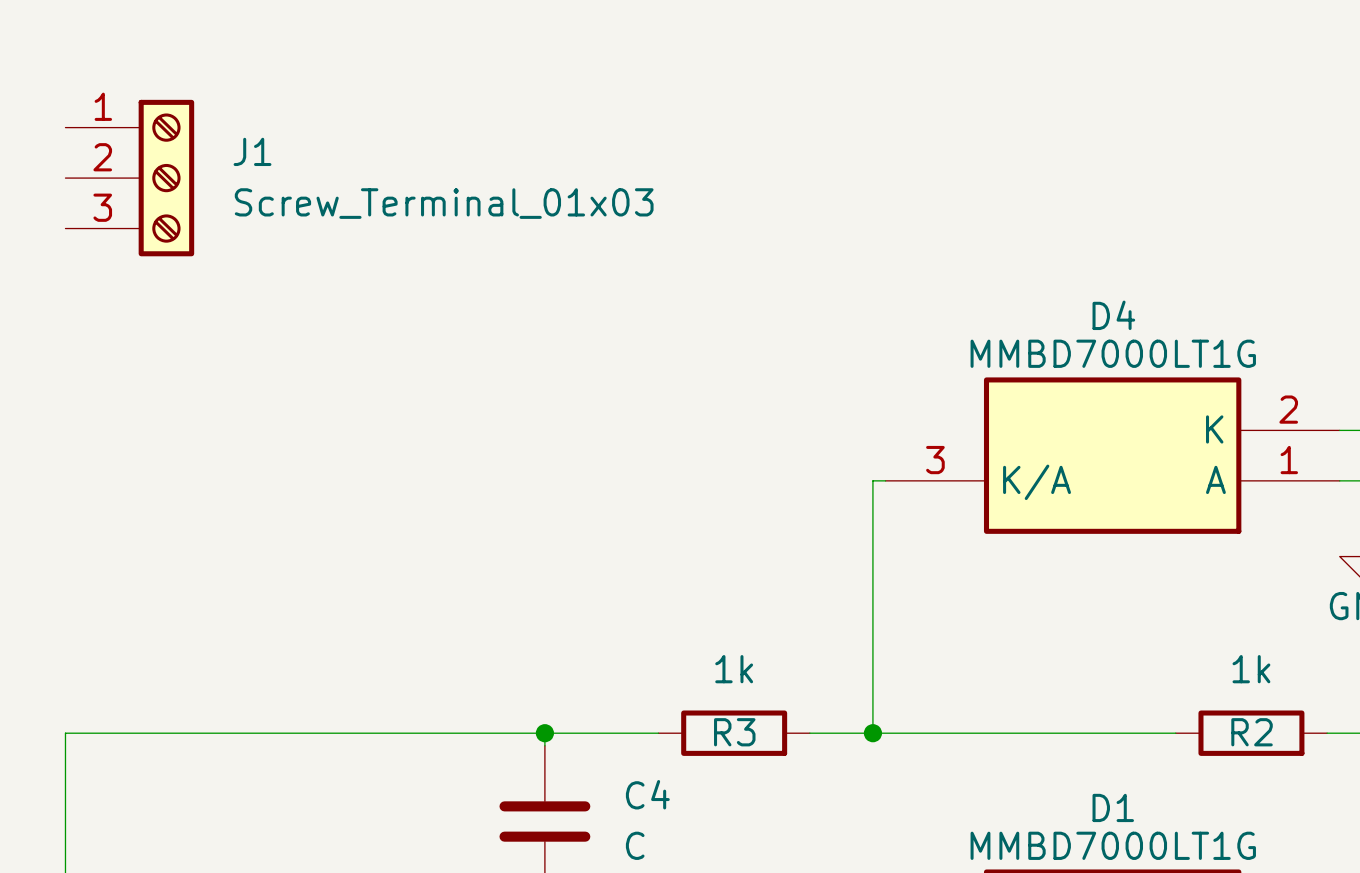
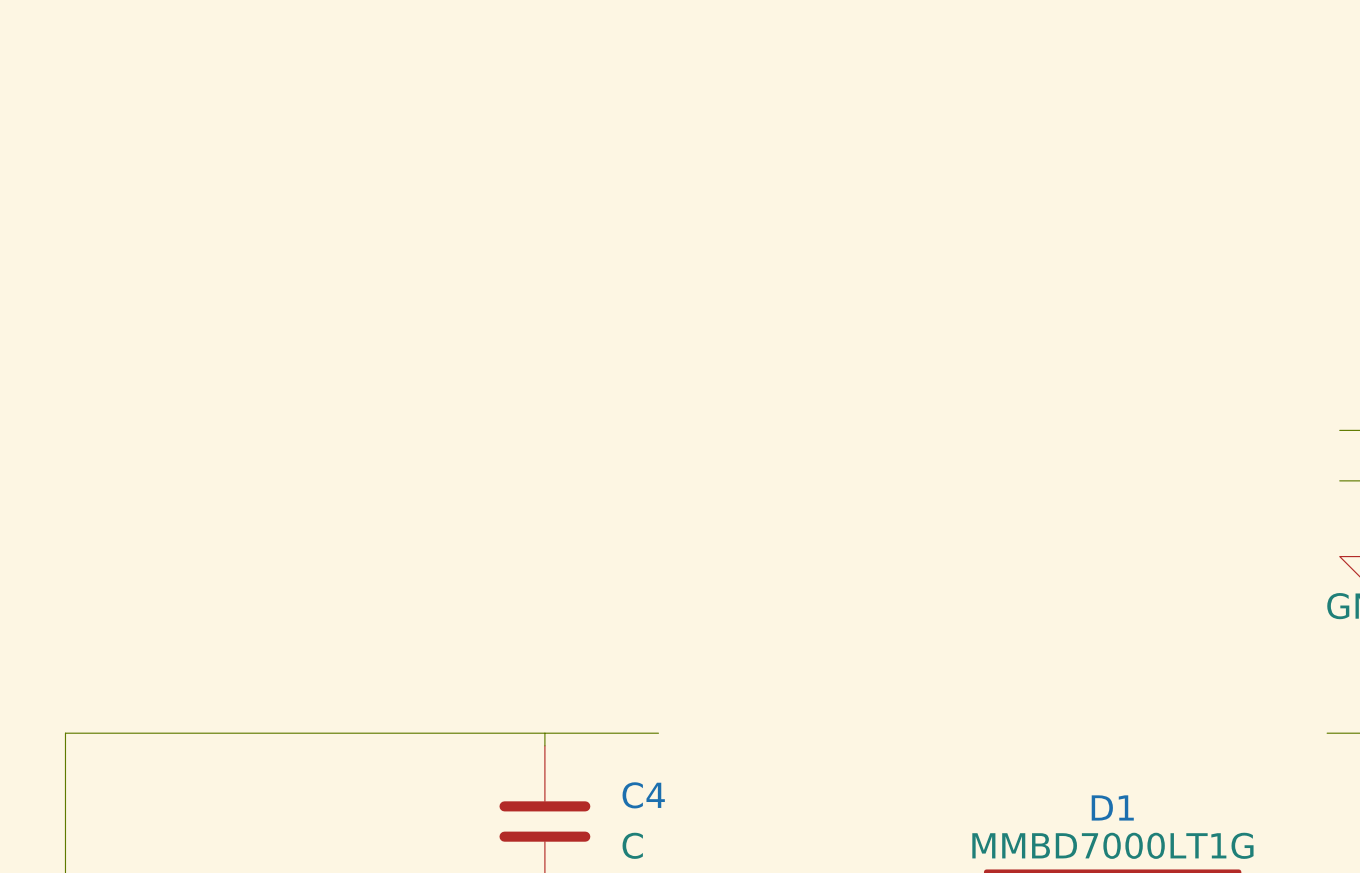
J1: Screw_Terminal_01x03 (129, 178) -> none
D4: MMBD7000LT1G (1112, 455) -> none
wire: (885, 480) (872, 480) (872, 733) -> none
junction: (544, 733) -> none
R3: 1k (734, 733) -> none
wire: (809, 733) (1175, 733) -> none
junction: (872, 733) -> none
R2: 1k (1251, 733) -> none

